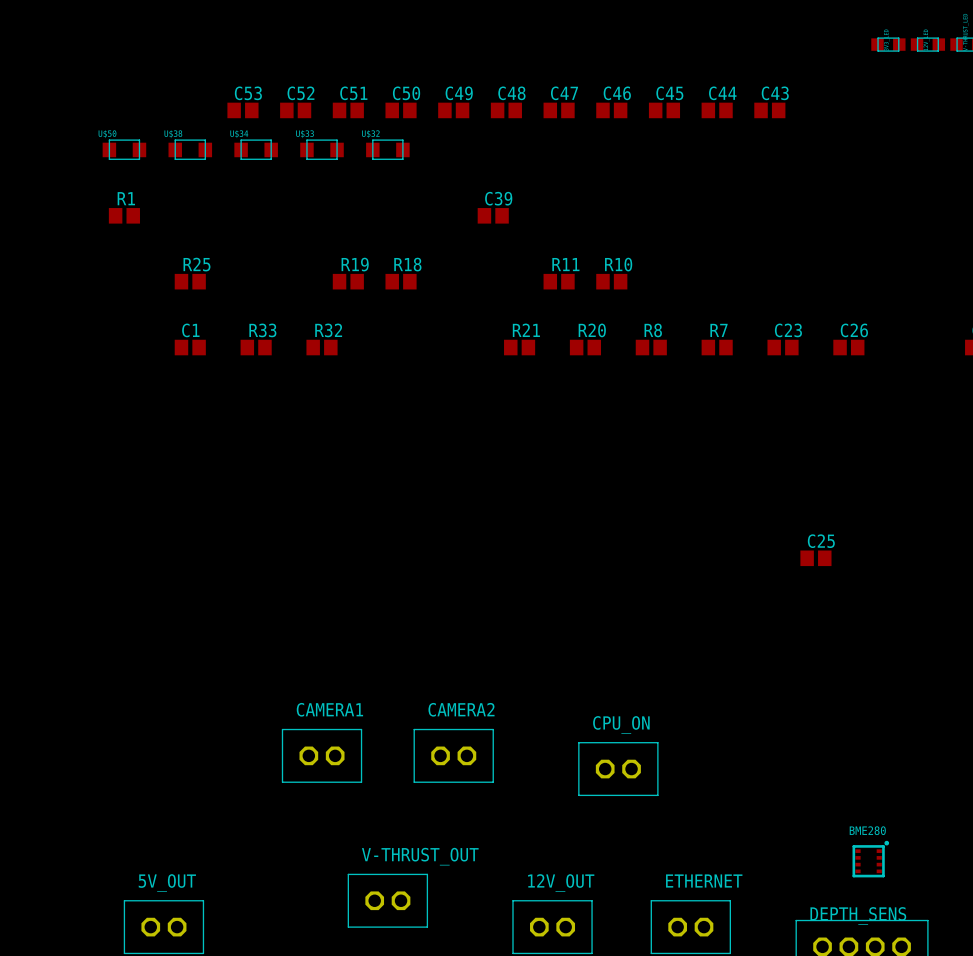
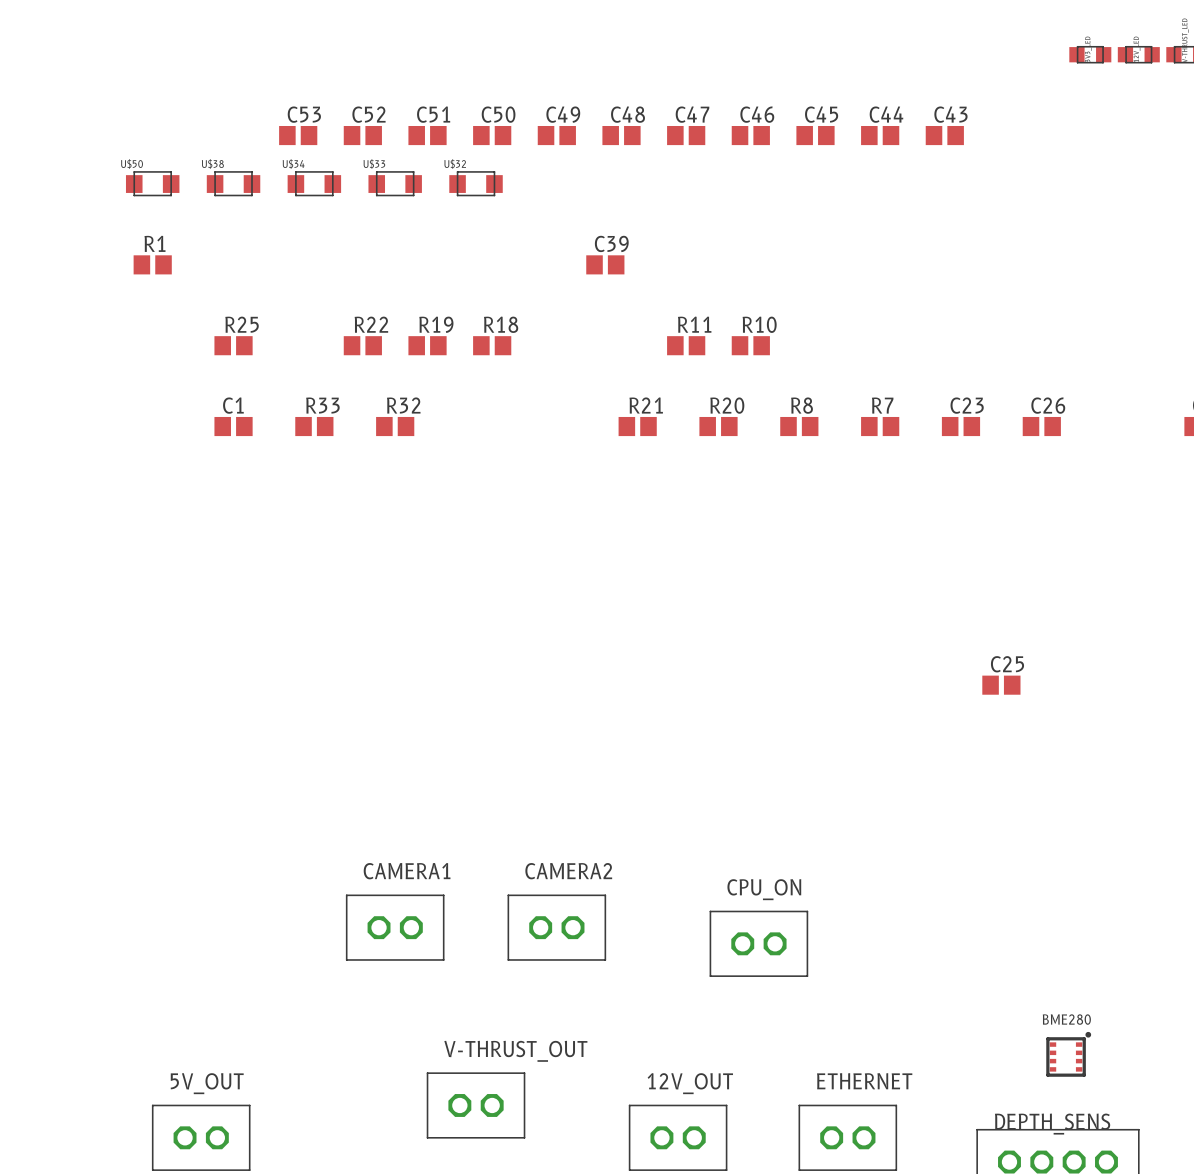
R22: none -> (362, 345)

